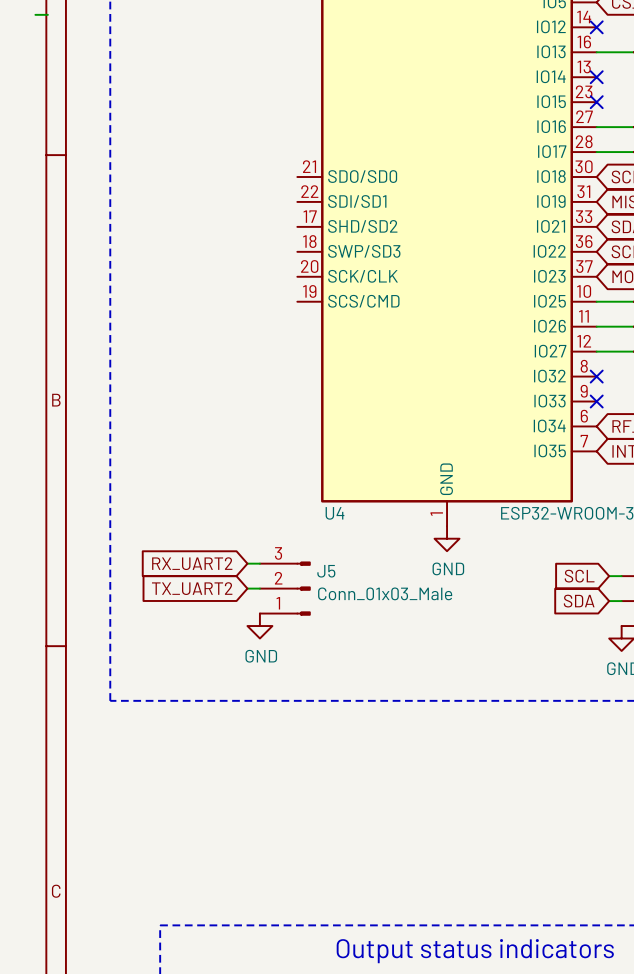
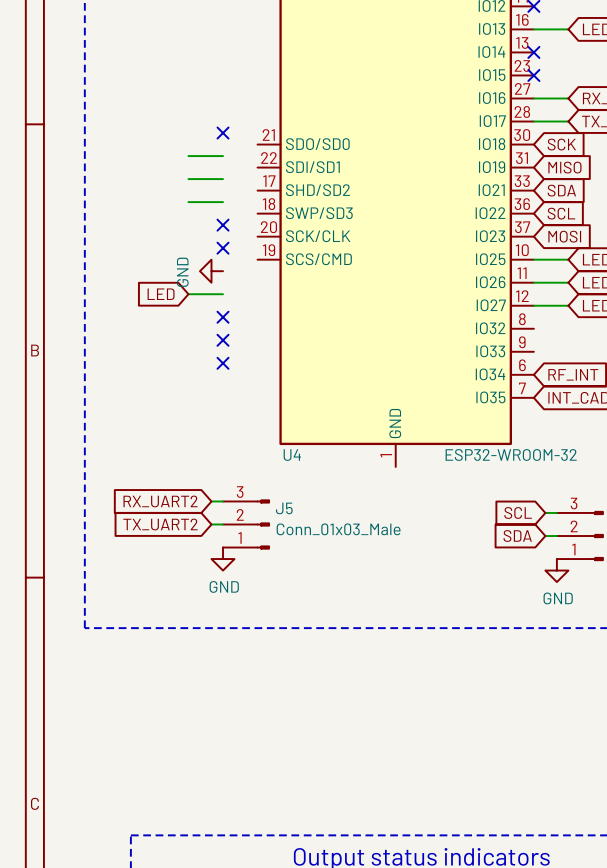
no-connect mark: none -> (223, 133)
wire: none -> (188, 156) (223, 156)
wire: none -> (188, 179) (223, 179)
wire: none -> (188, 202) (223, 202)
no-connect mark: none -> (223, 225)
no-connect mark: none -> (223, 248)
power symbol: none -> GND (211, 271)
global label: none -> LED (161, 294)
wire: none -> (188, 294) (223, 294)
no-connect mark: none -> (223, 317)
no-connect mark: (596, 376) -> none
no-connect mark: none -> (223, 340)
no-connect mark: (596, 401) -> none
no-connect mark: none -> (223, 363)
power symbol: GND (447, 538) -> none

